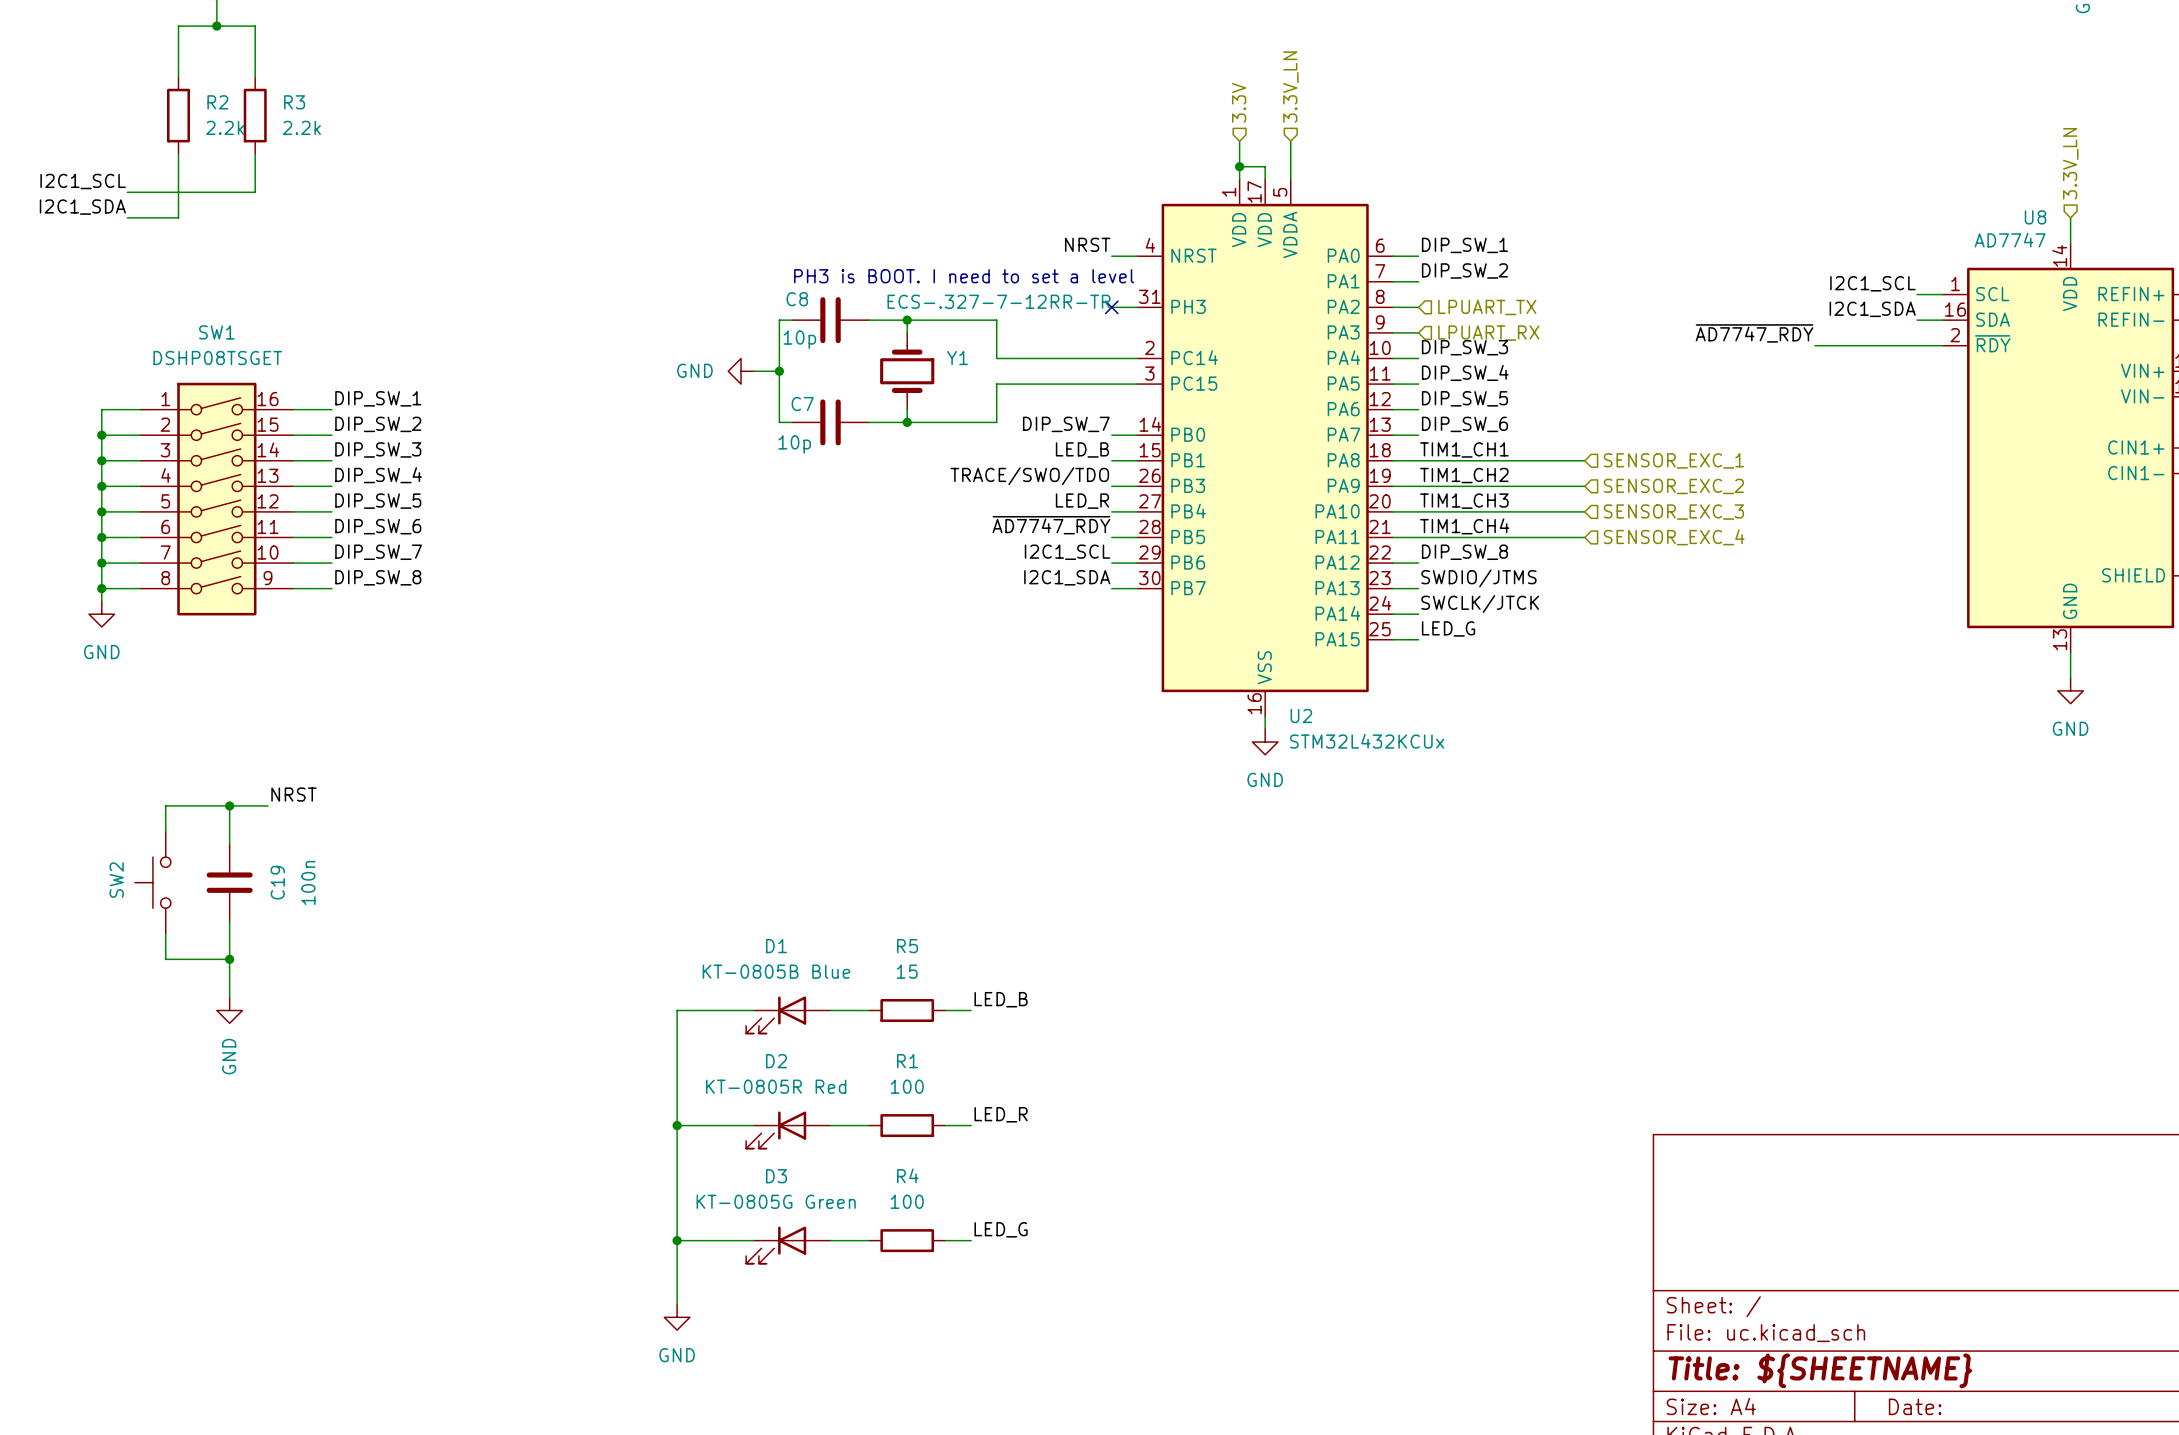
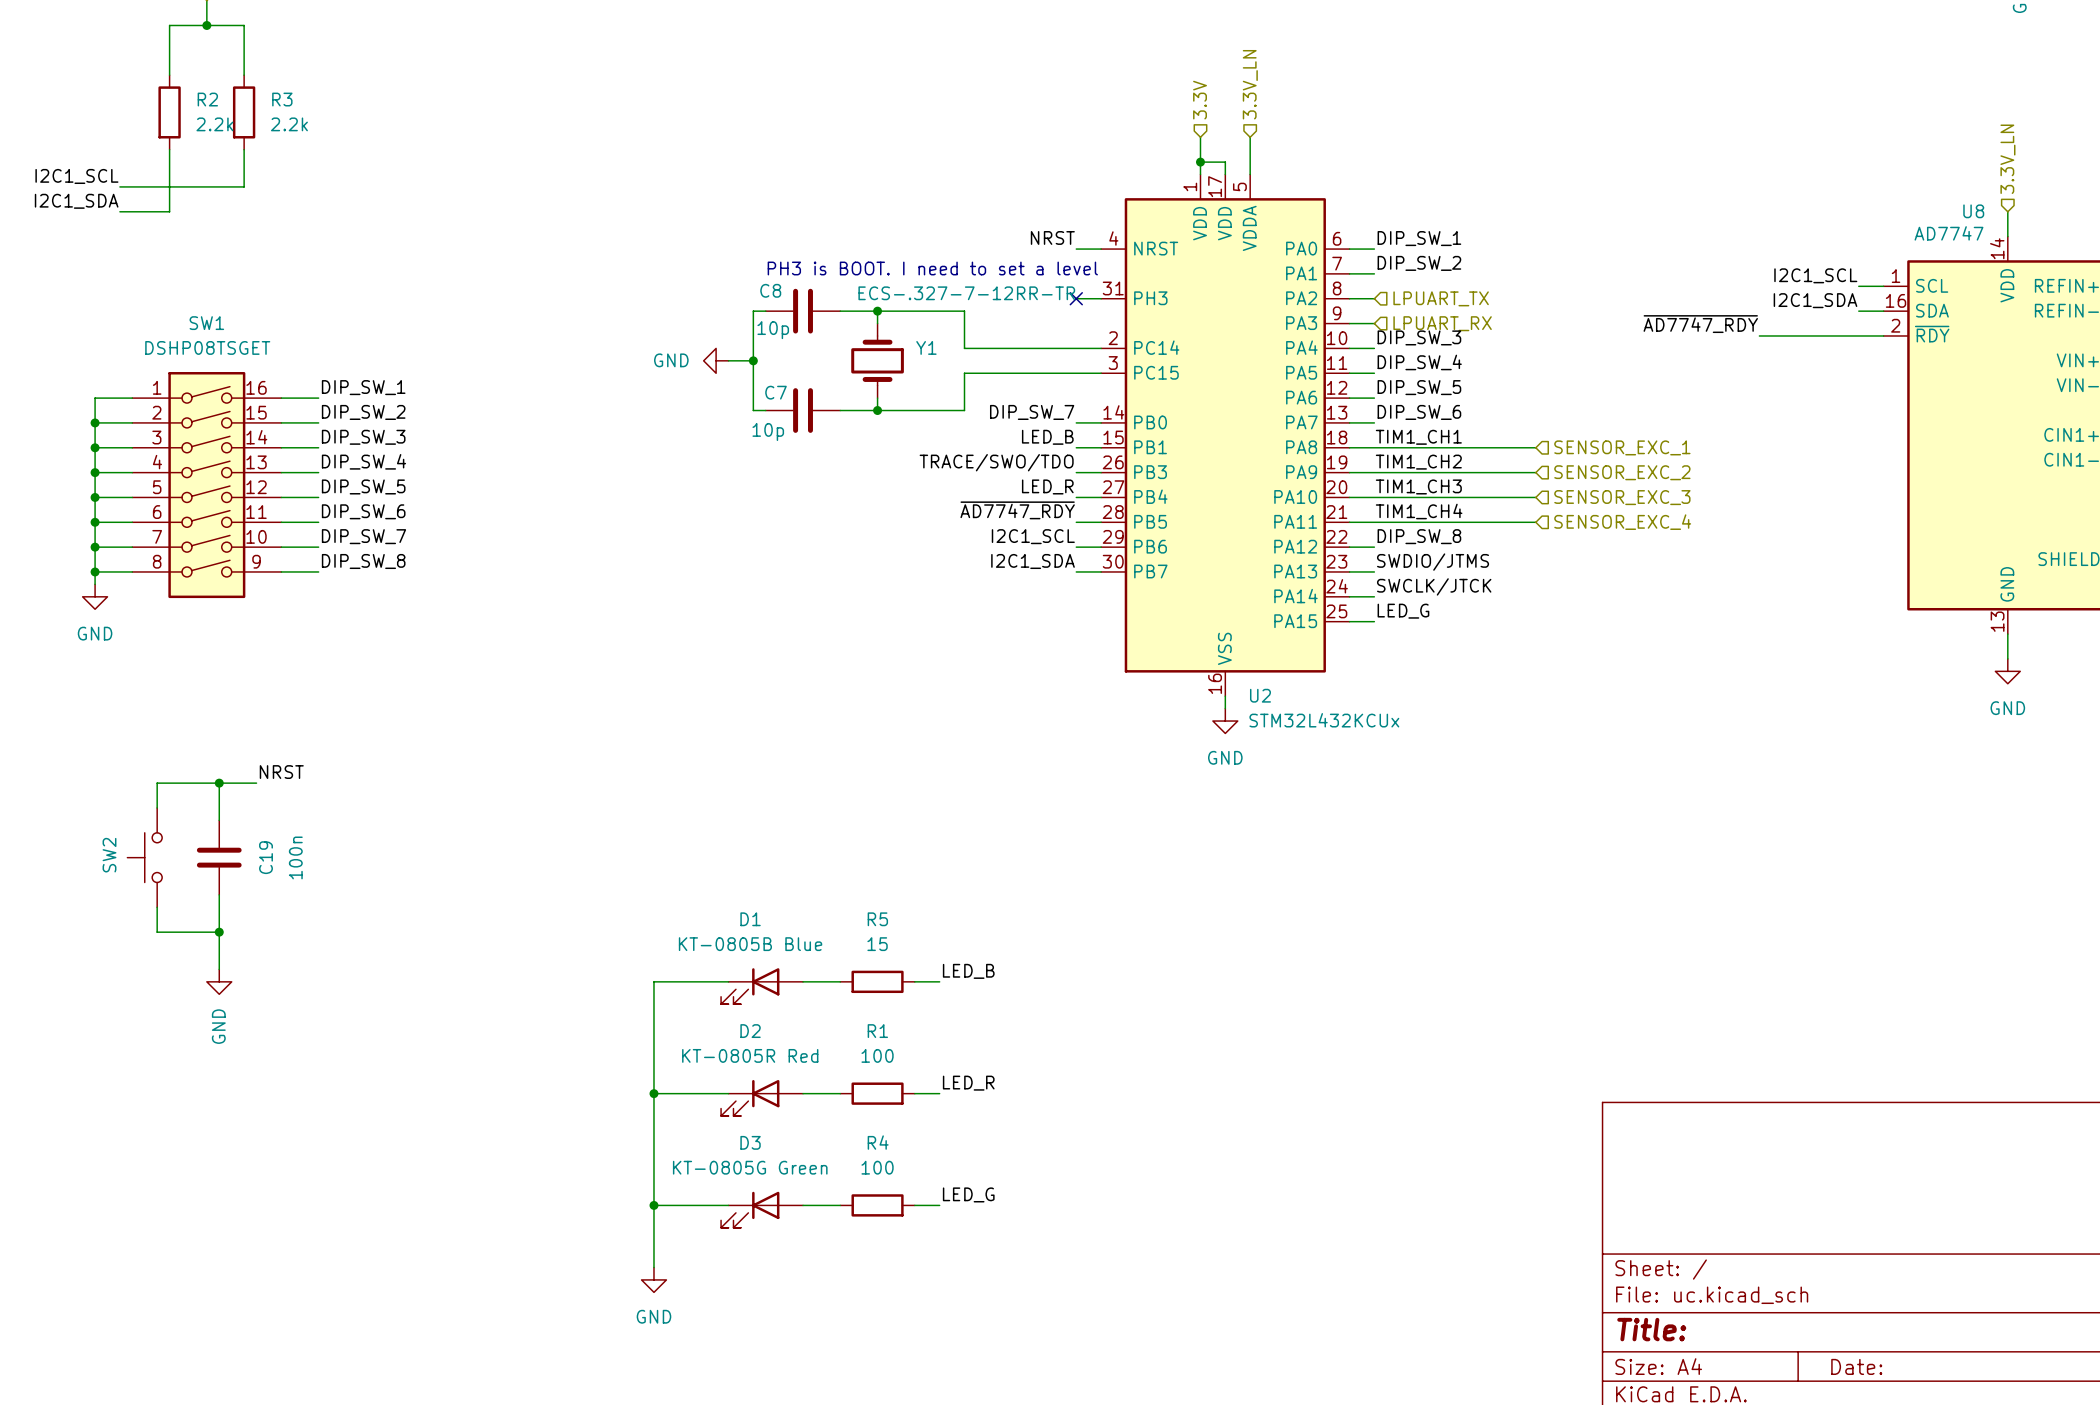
title block: Title: ${SHEETNAME} (1820, 1370) -> Title: (1651, 1329)

